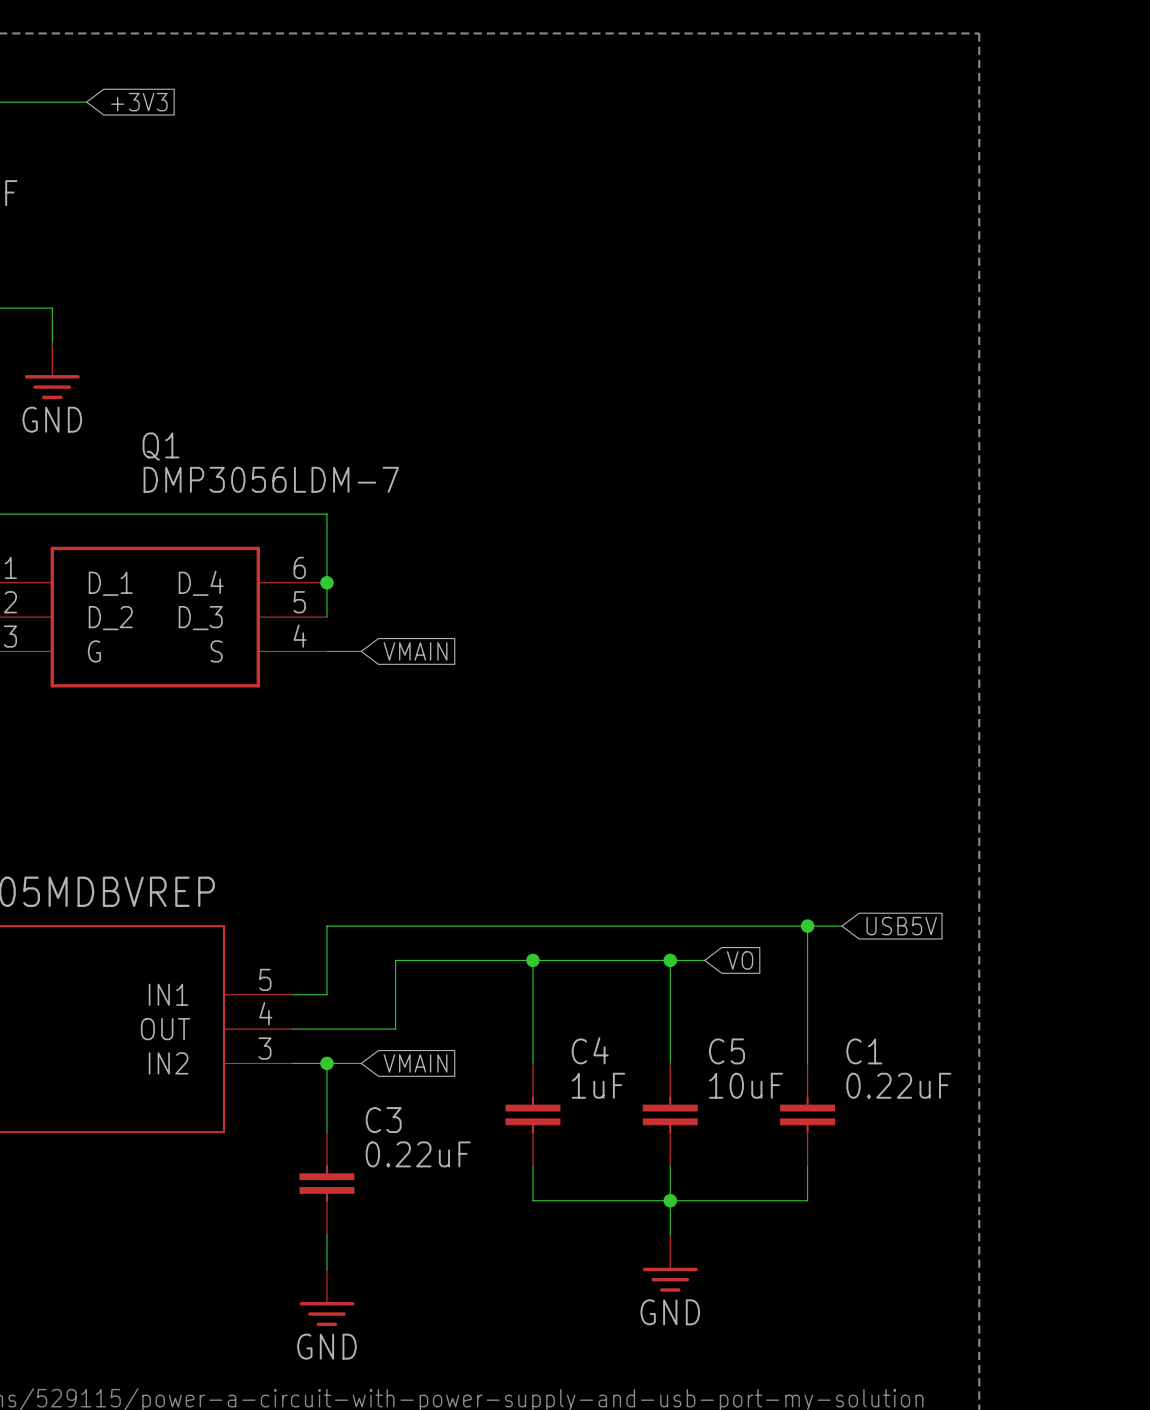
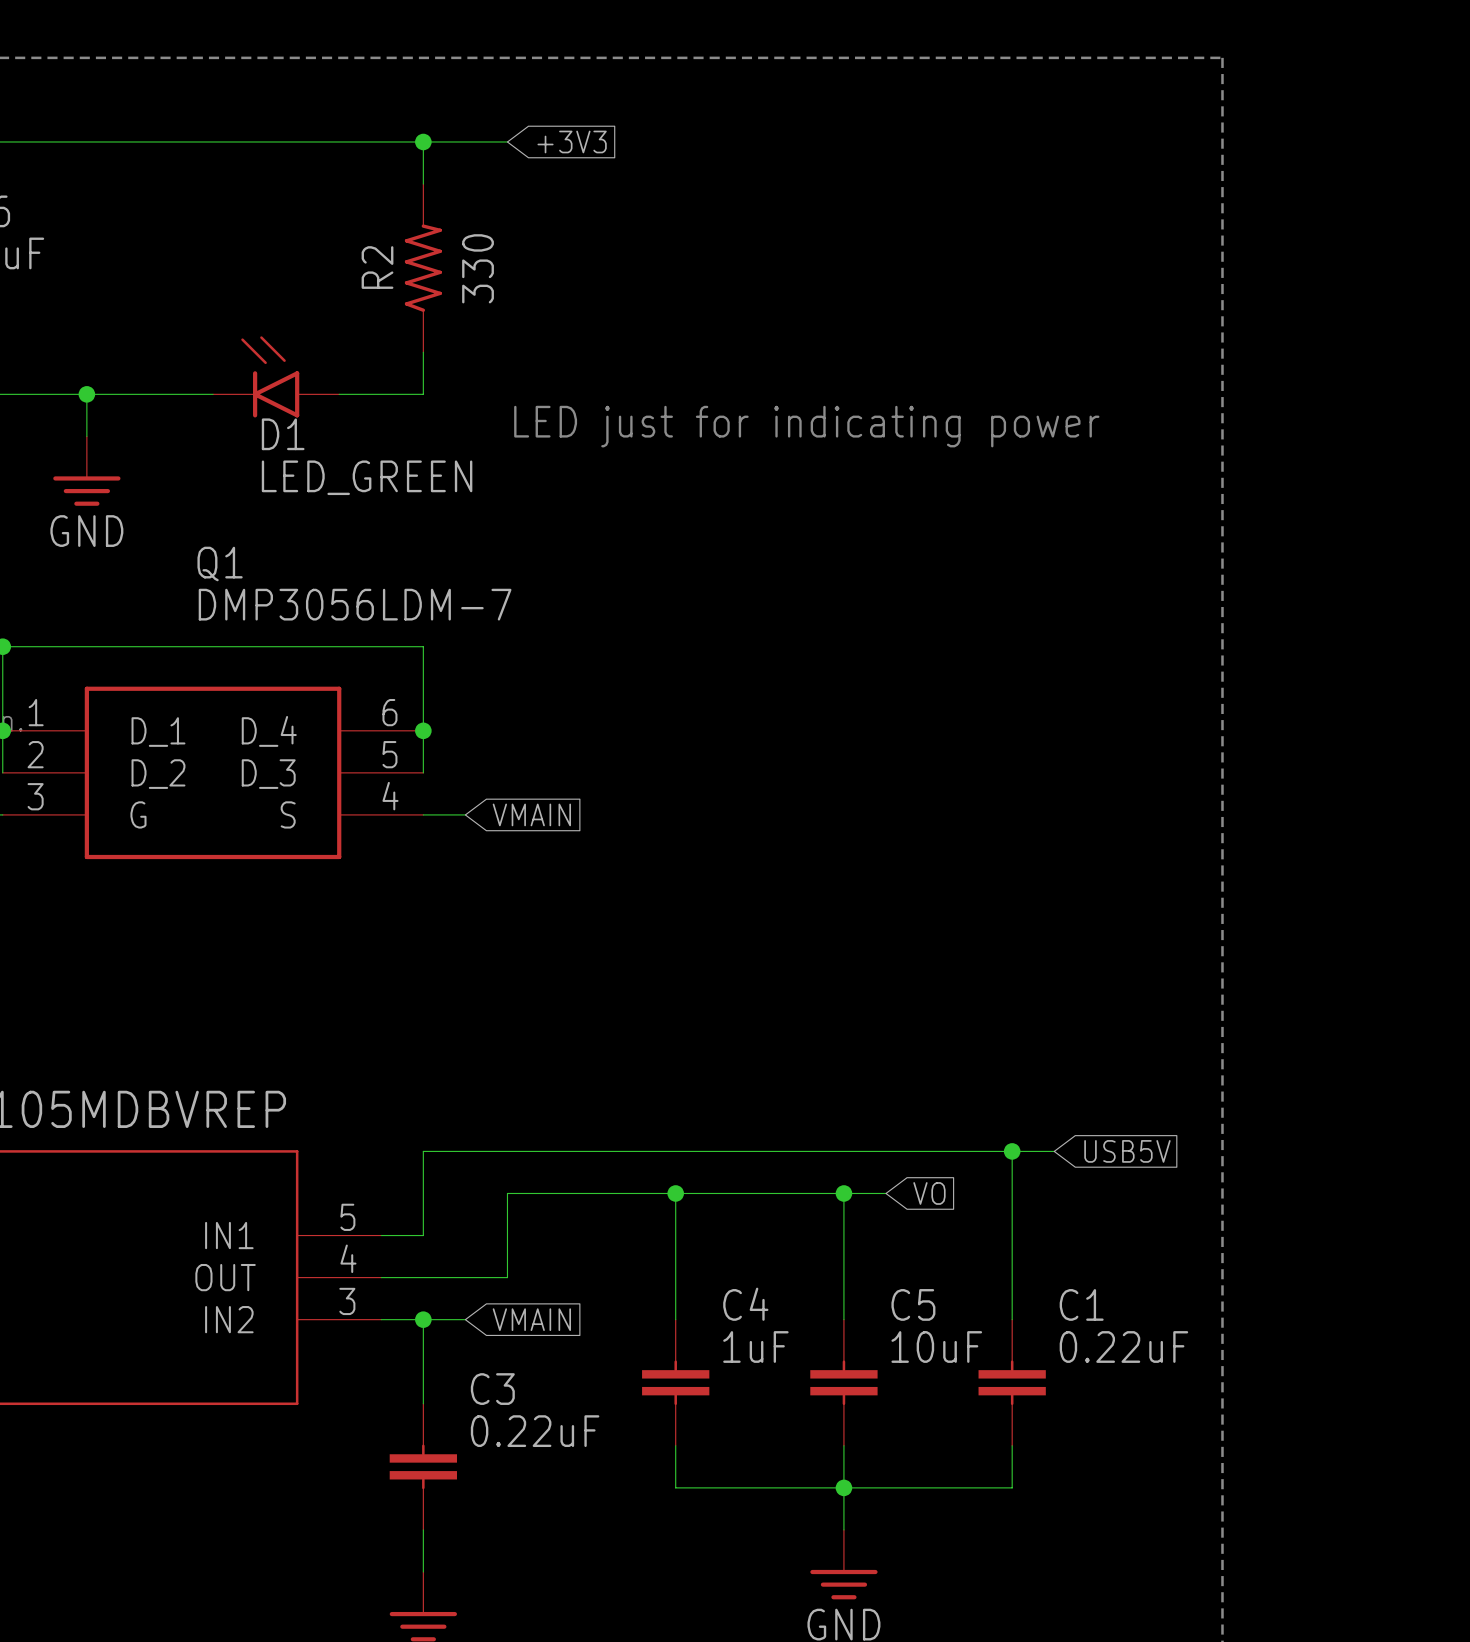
wire: none -> (128, 141) (507, 141)
global label position: +3V3 (139, 102) -> +3V3 (572, 141)
wire: none -> (423, 141) (423, 184)
junction: none -> (423, 141)
R2: none -> 330 (423, 268)
wire: none -> (423, 352) (423, 394) (339, 394)
D1: none -> LED_GREEN (276, 376)
wire: none -> (86, 394) (213, 394)
junction: none -> (86, 394)
text: none -> LED just for indicating power (806, 426)

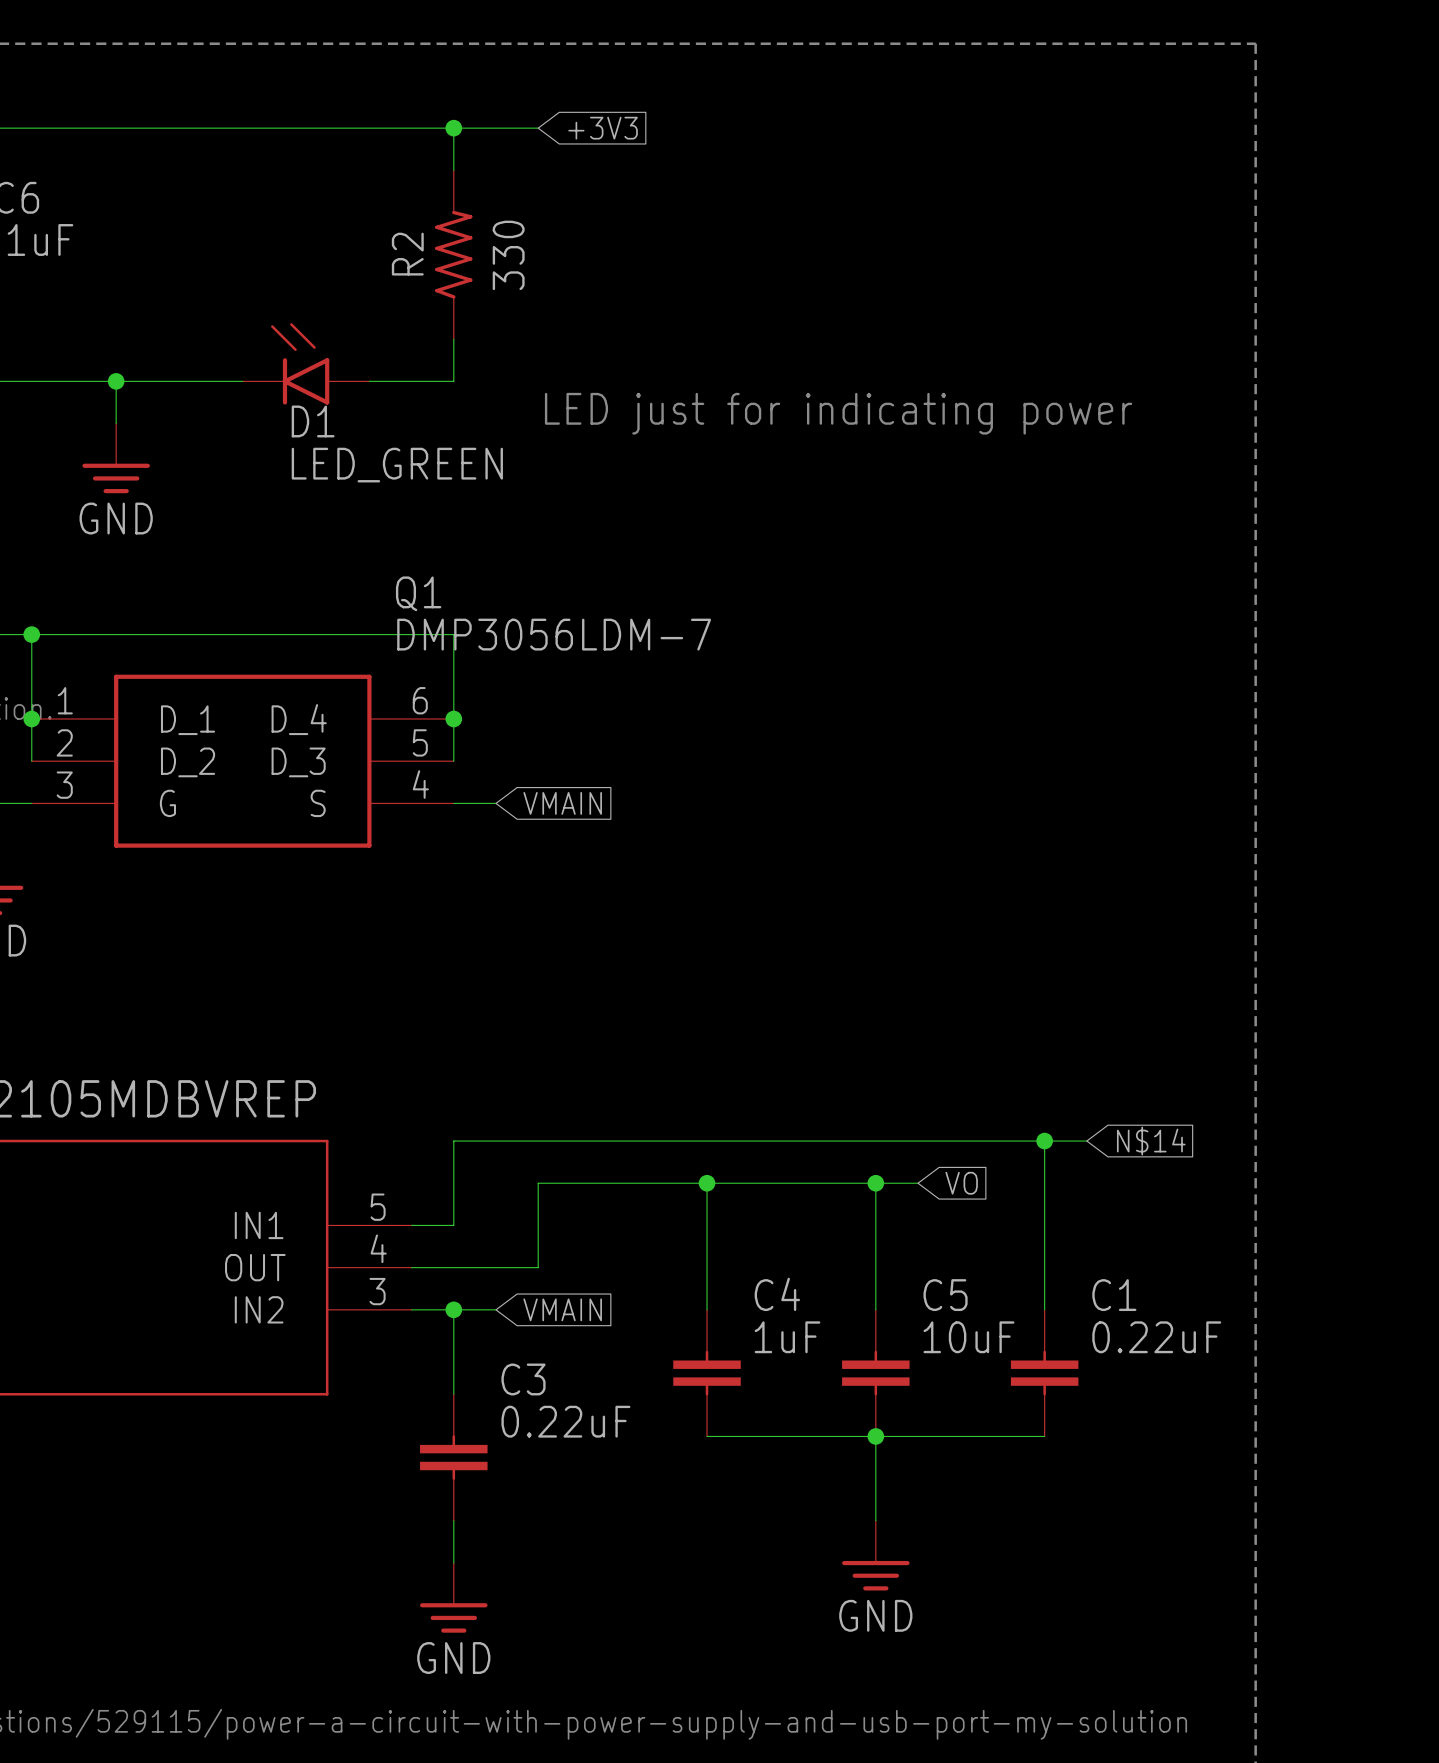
Q1 name position: Q1 (220, 563) -> Q1 (418, 593)
Q1 value position: DMP3056LDM-7 (355, 604) -> DMP3056LDM-7 (554, 634)
global label: USB5V (1127, 1151) -> N$14 (1151, 1141)
wire: (675, 1445) (675, 1487) (1012, 1487) (1012, 1445) -> (707, 1436) (1044, 1436)
junction position: (843, 1487) -> (875, 1436)

